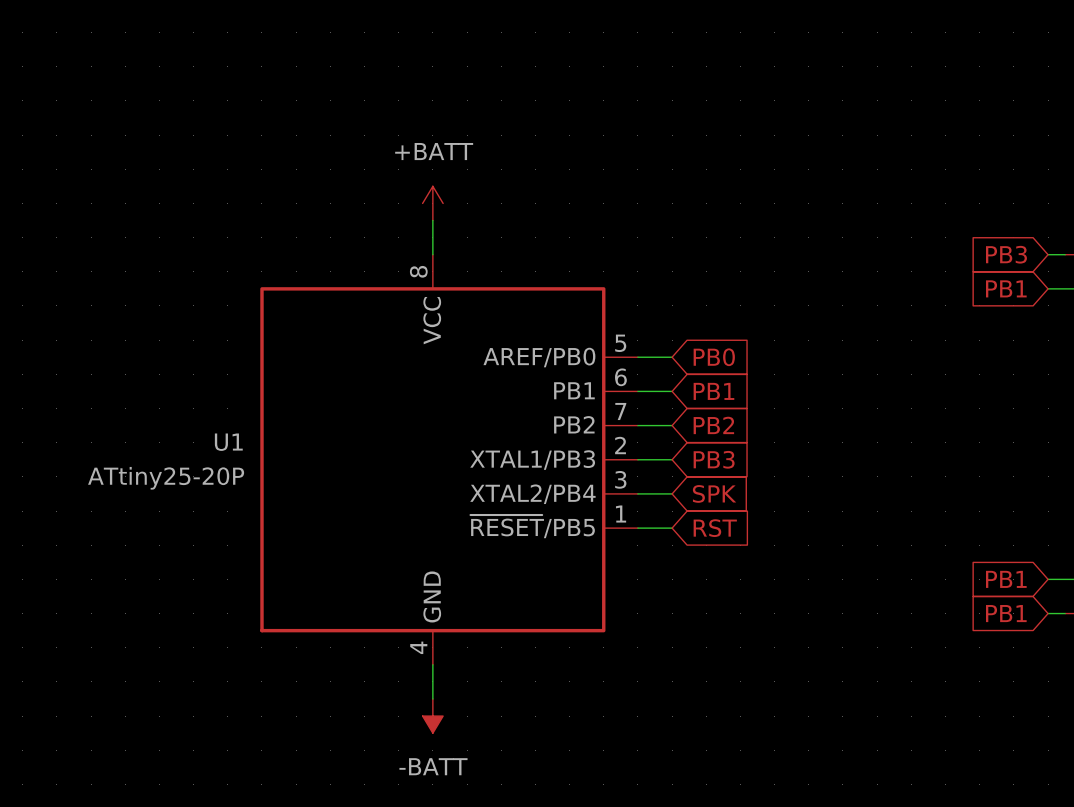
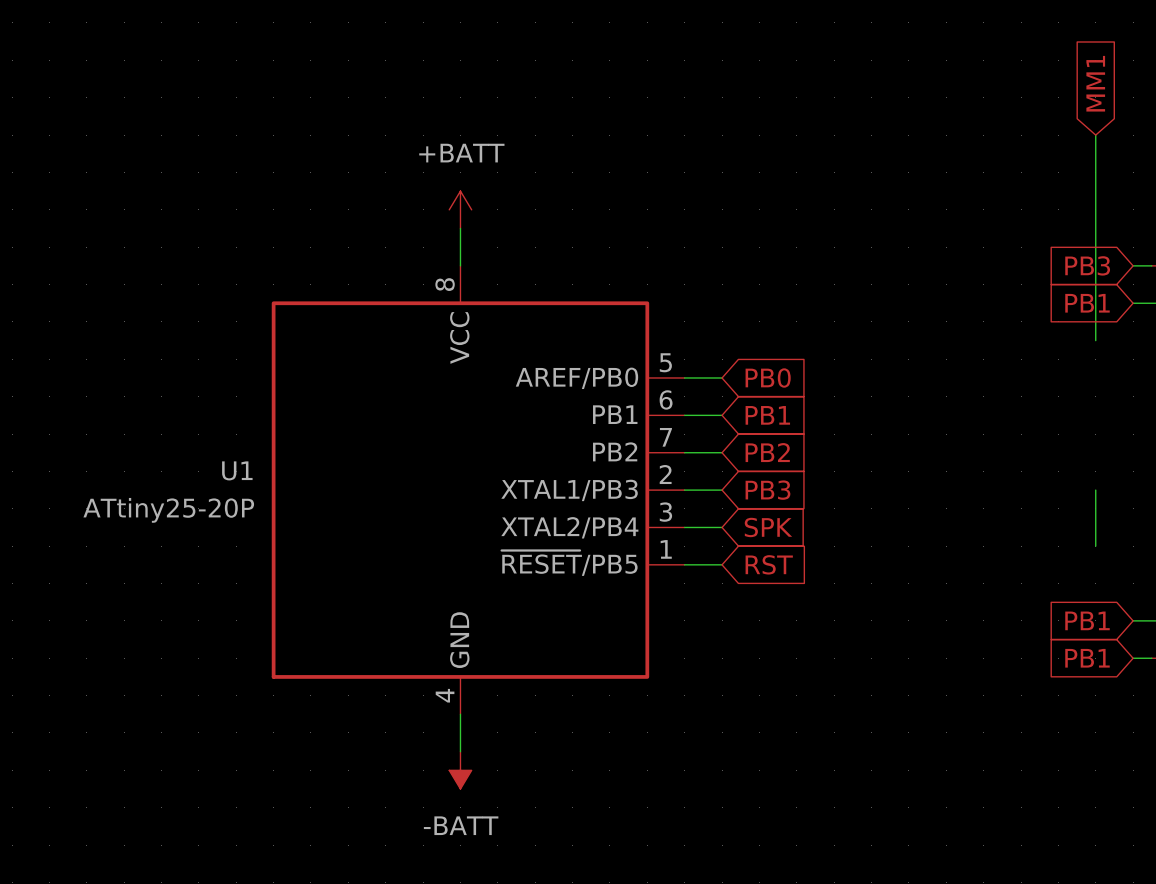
global label: none -> MM1 (1095, 83)
wire: none -> (1095, 135) (1095, 340)
wire: none -> (1095, 490) (1095, 546)

